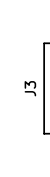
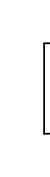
J3 name: J3 (30, 88) -> none

